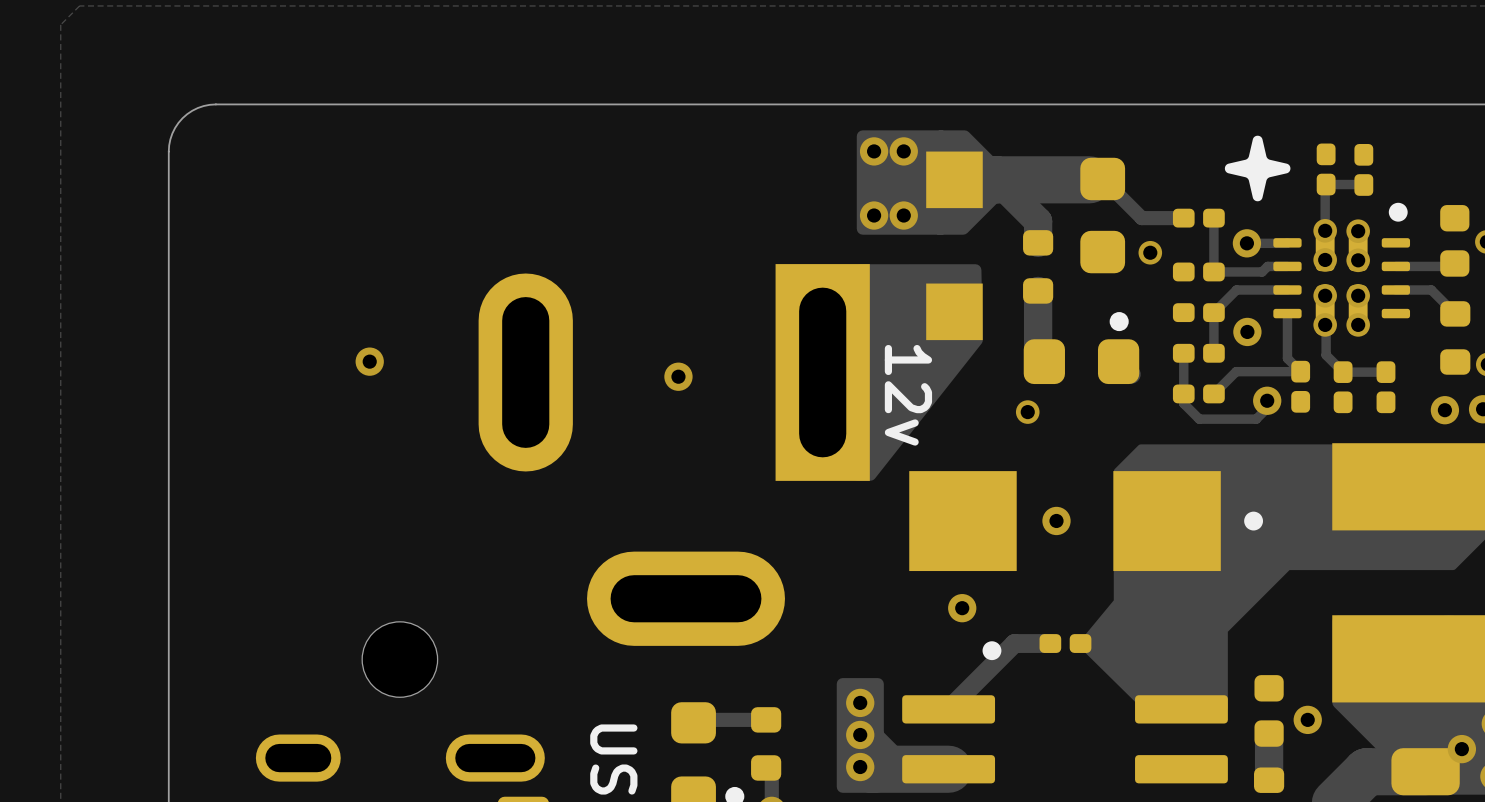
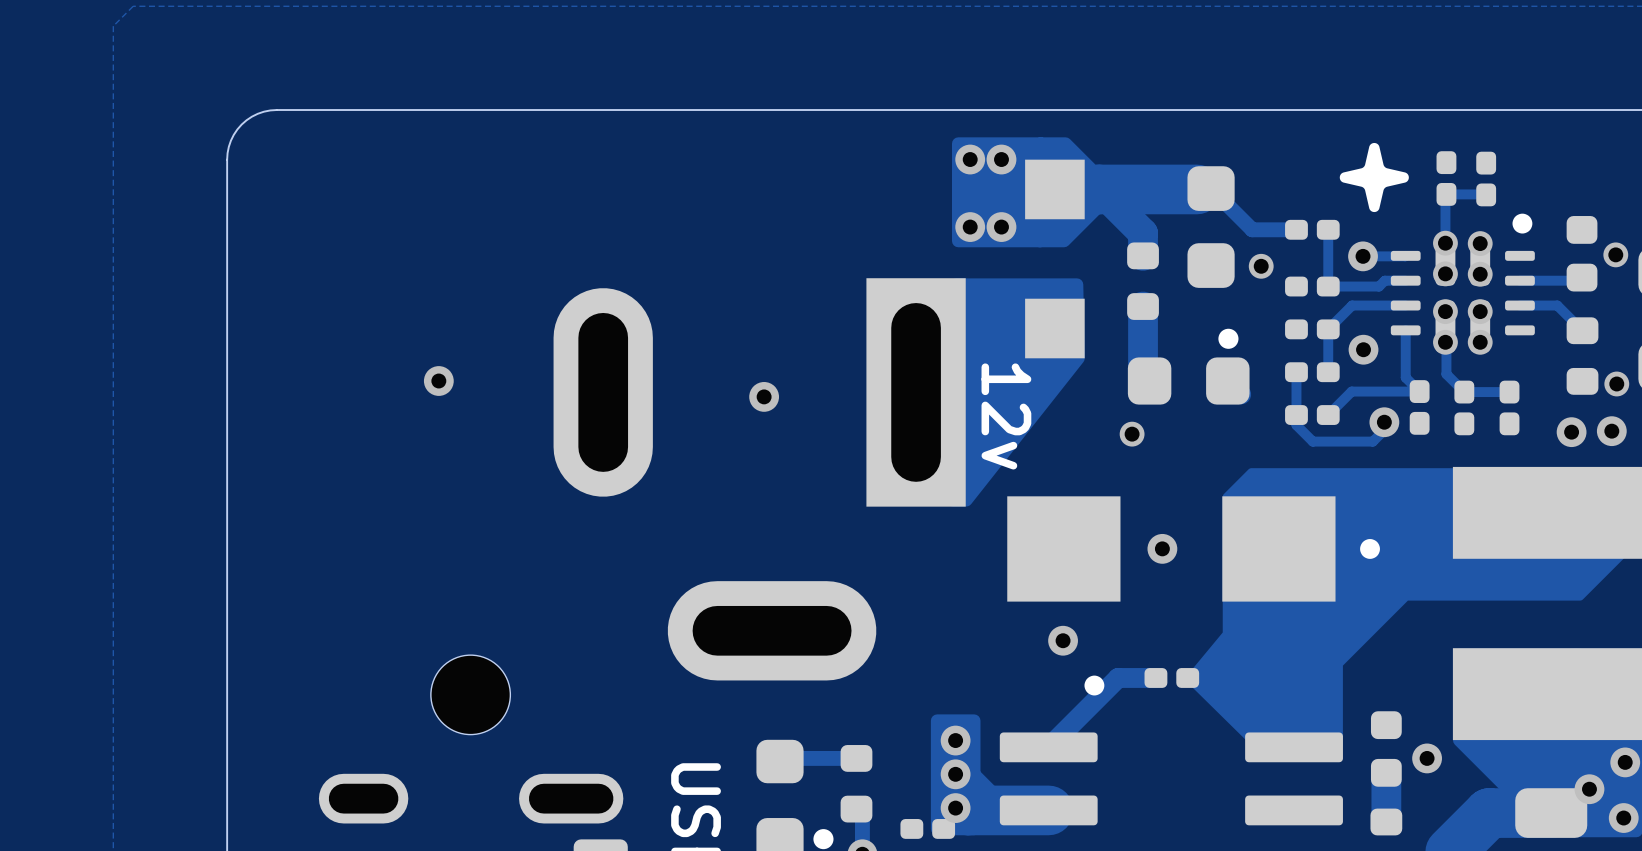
part: none -> (927, 828)

